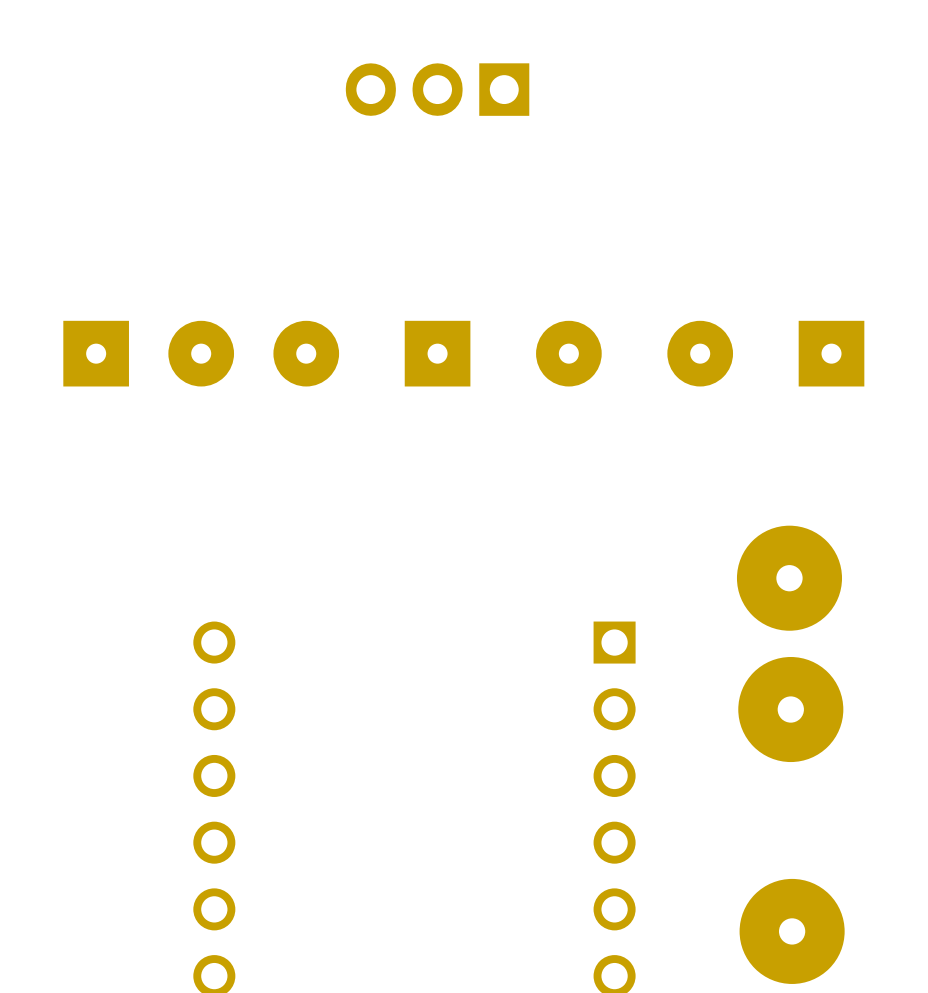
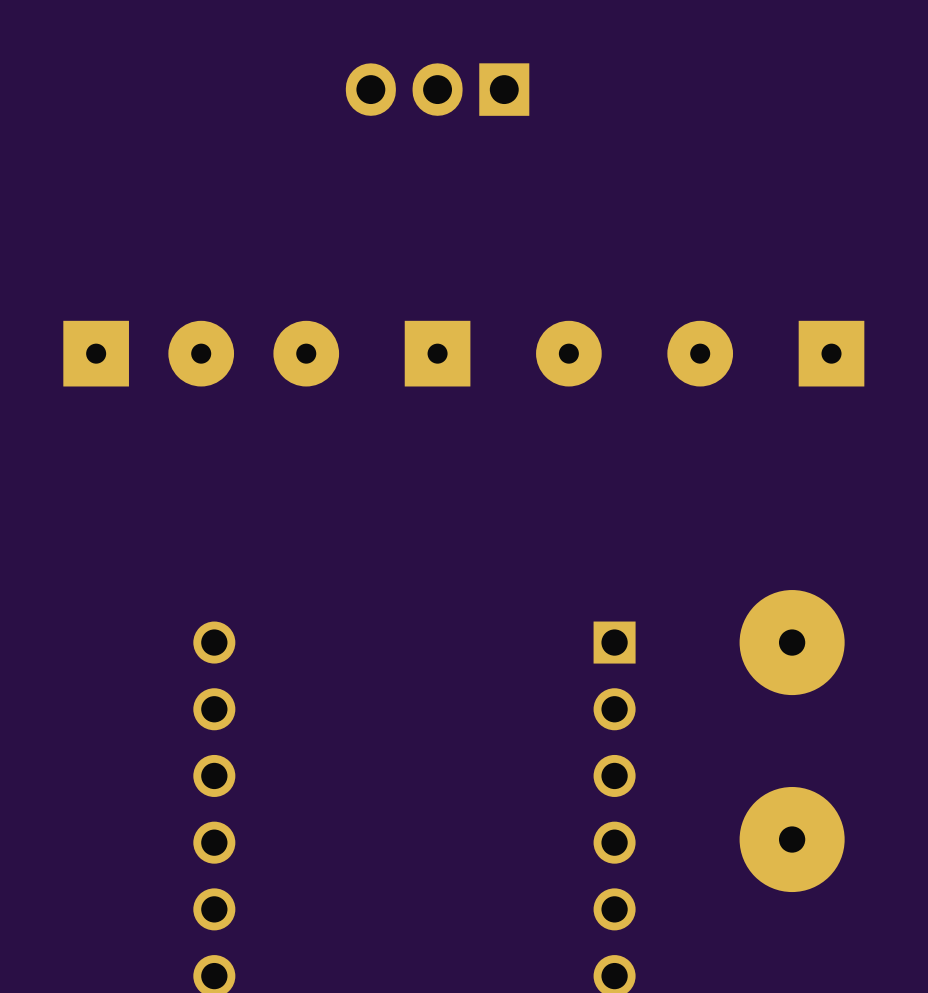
part: (789, 578) -> none
part: none -> (792, 642)
part: (790, 709) -> none
part: none -> (792, 839)
part: (792, 931) -> none

